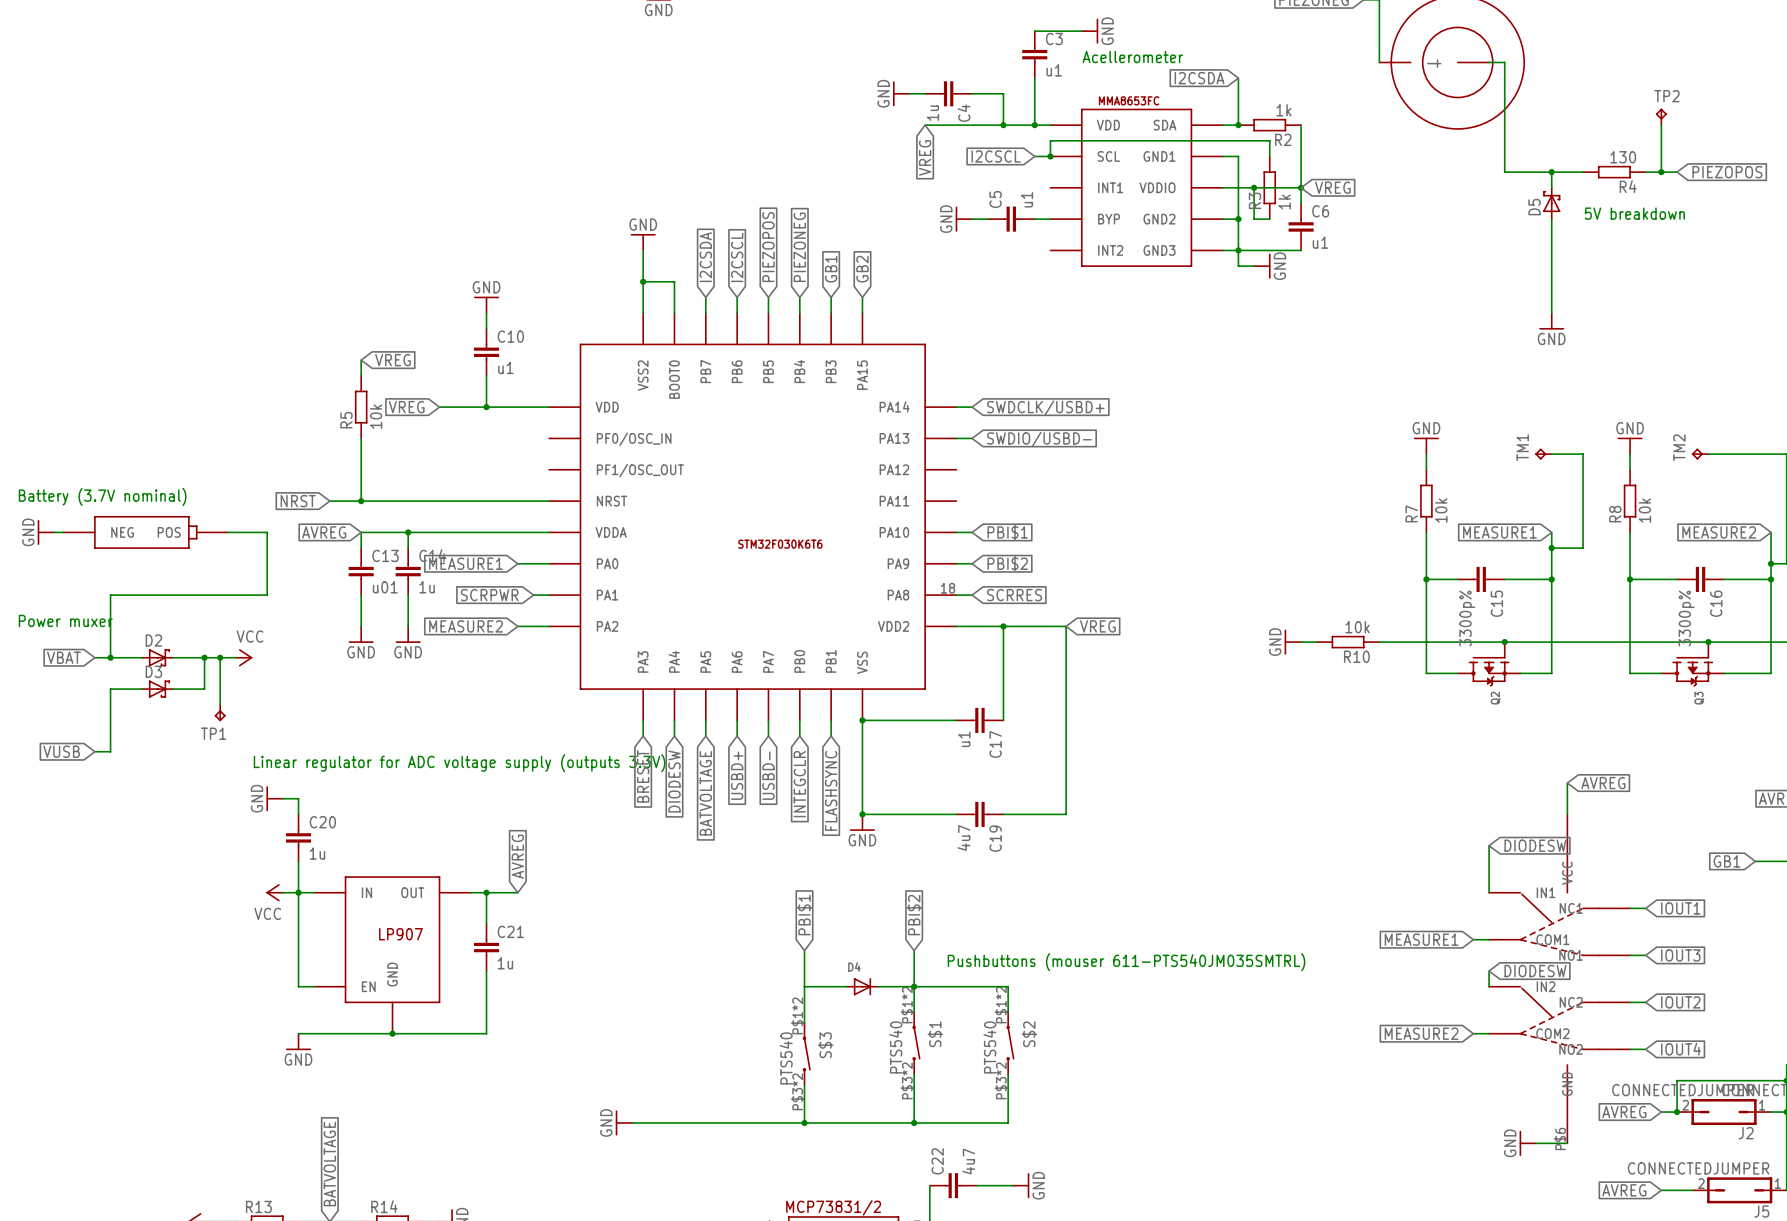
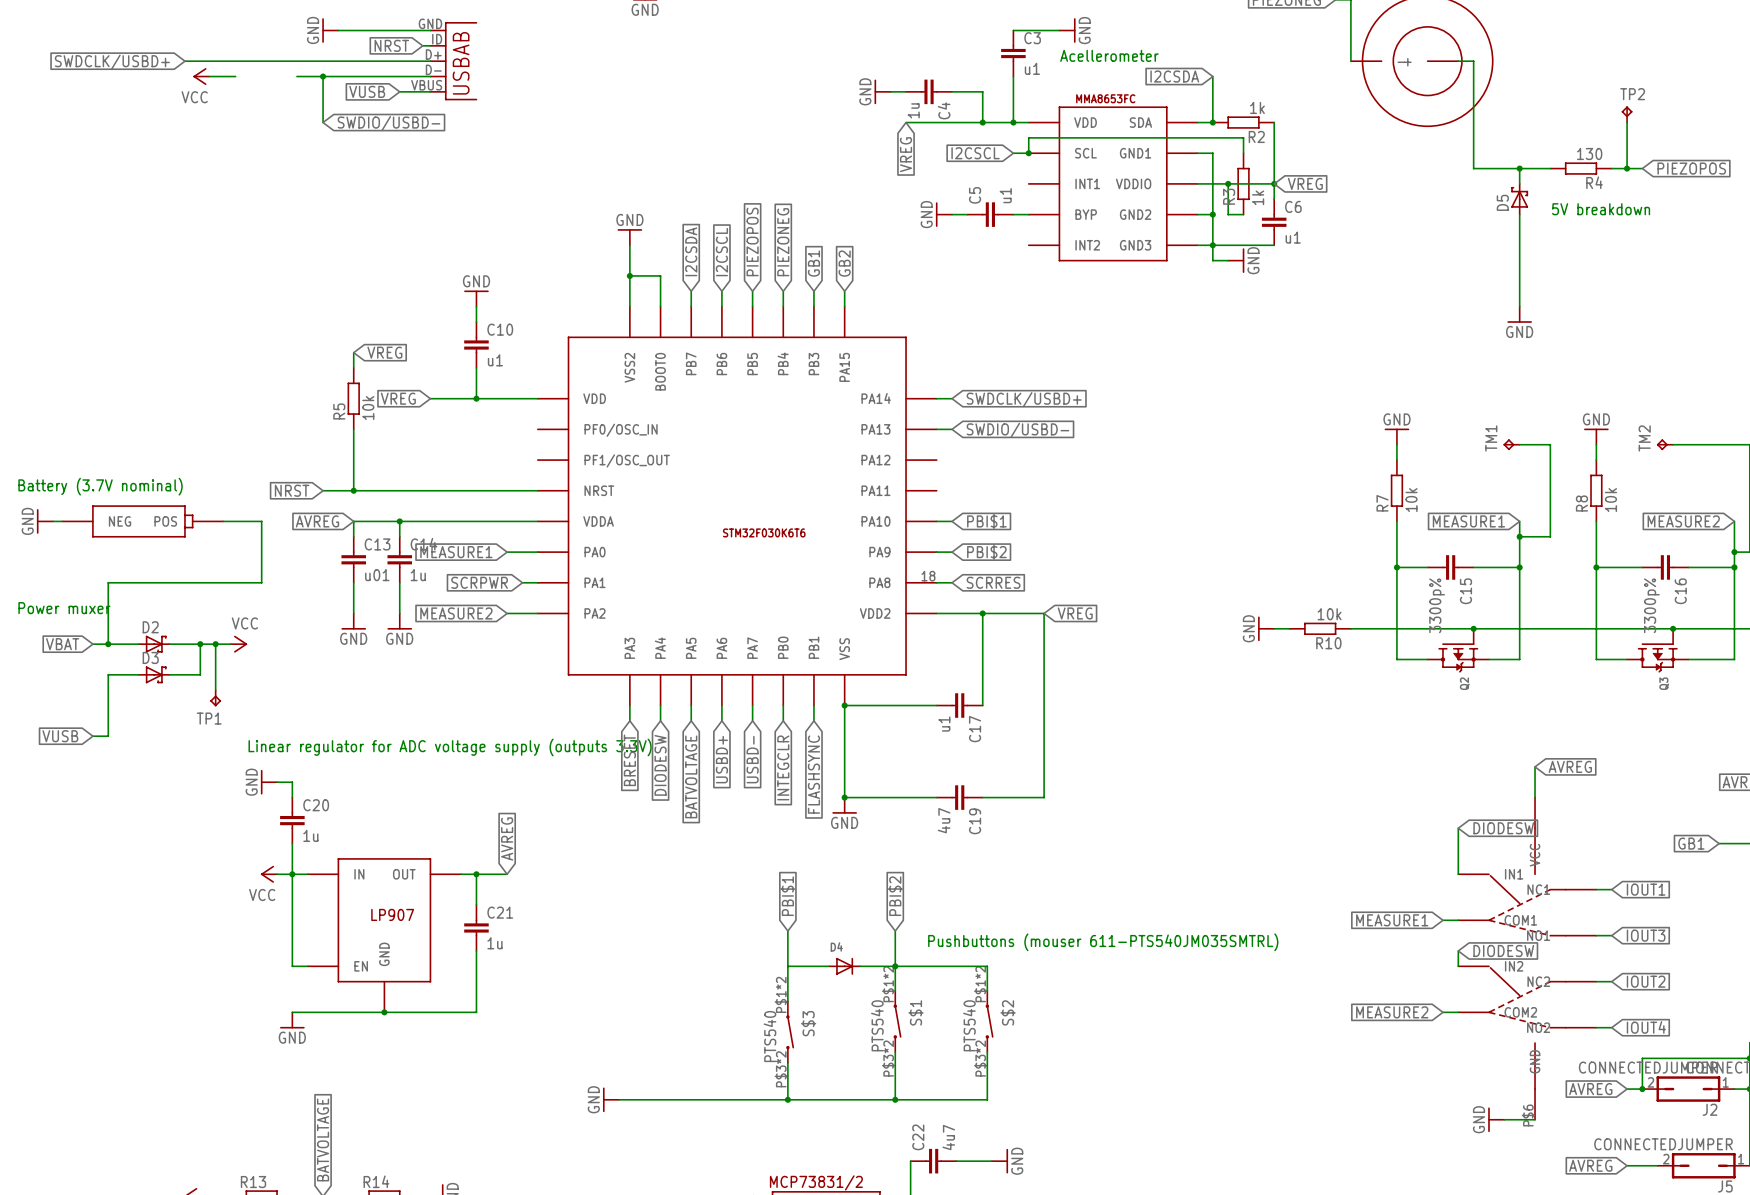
power symbol: none -> GND (330, 30)
wire: none -> (338, 30) (430, 30)
global label: none -> NRST (391, 45)
wire: none -> (422, 45) (430, 45)
wire: none -> (184, 61) (430, 61)
part: none -> (453, 61)
global label: none -> SWDCLK/USBD+ (112, 62)
power symbol: none -> VCC (201, 76)
wire: none -> (209, 76) (235, 76)
wire: none -> (296, 76) (430, 76)
wire: none -> (323, 76) (323, 122)
junction: none -> (323, 76)
global label: none -> VUSB (367, 91)
wire: none -> (399, 91) (430, 91)
global label: none -> SWDIO/USBD- (388, 123)

